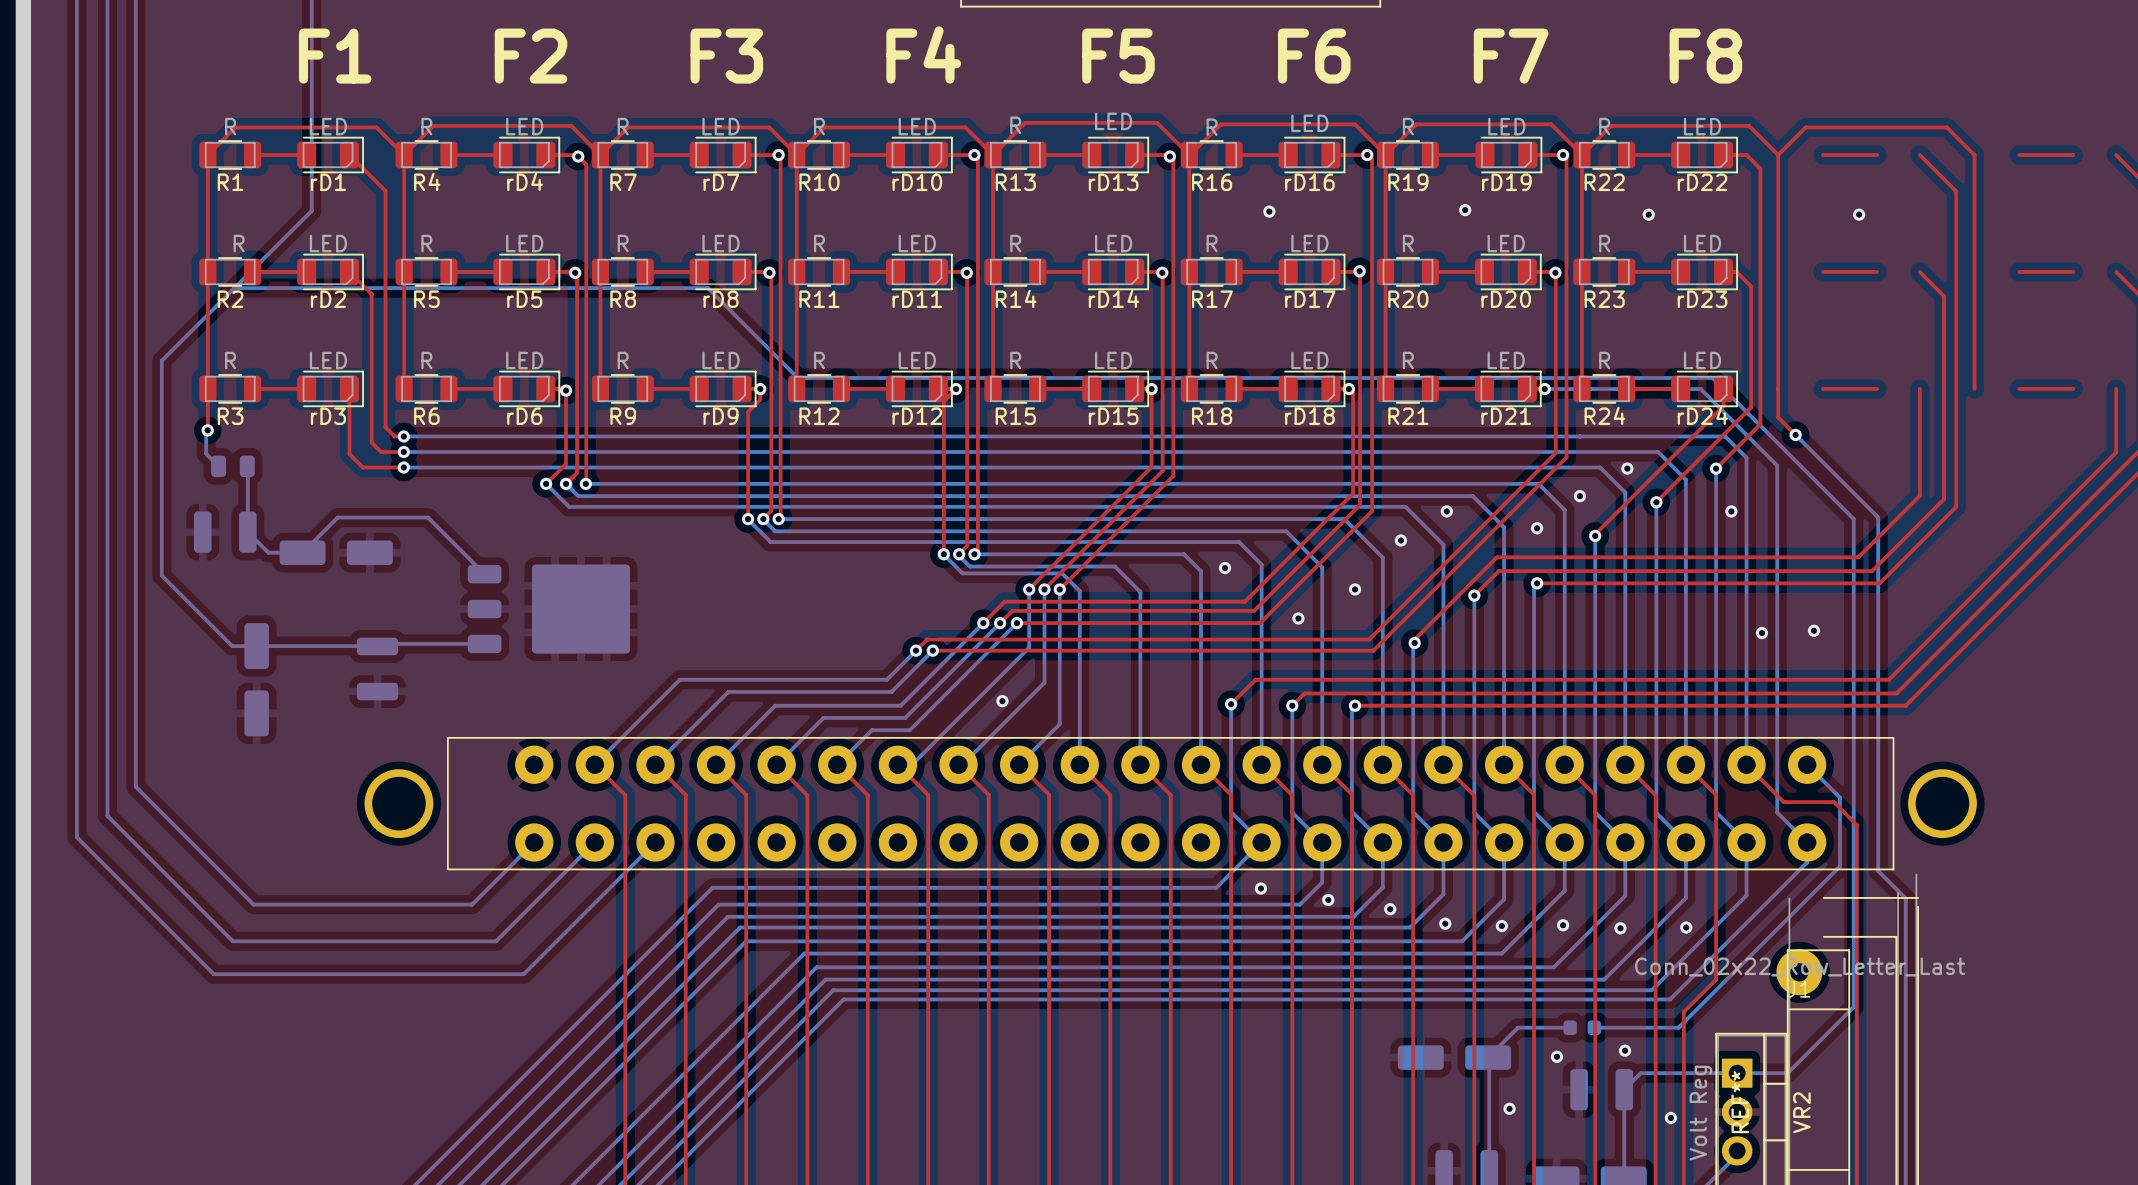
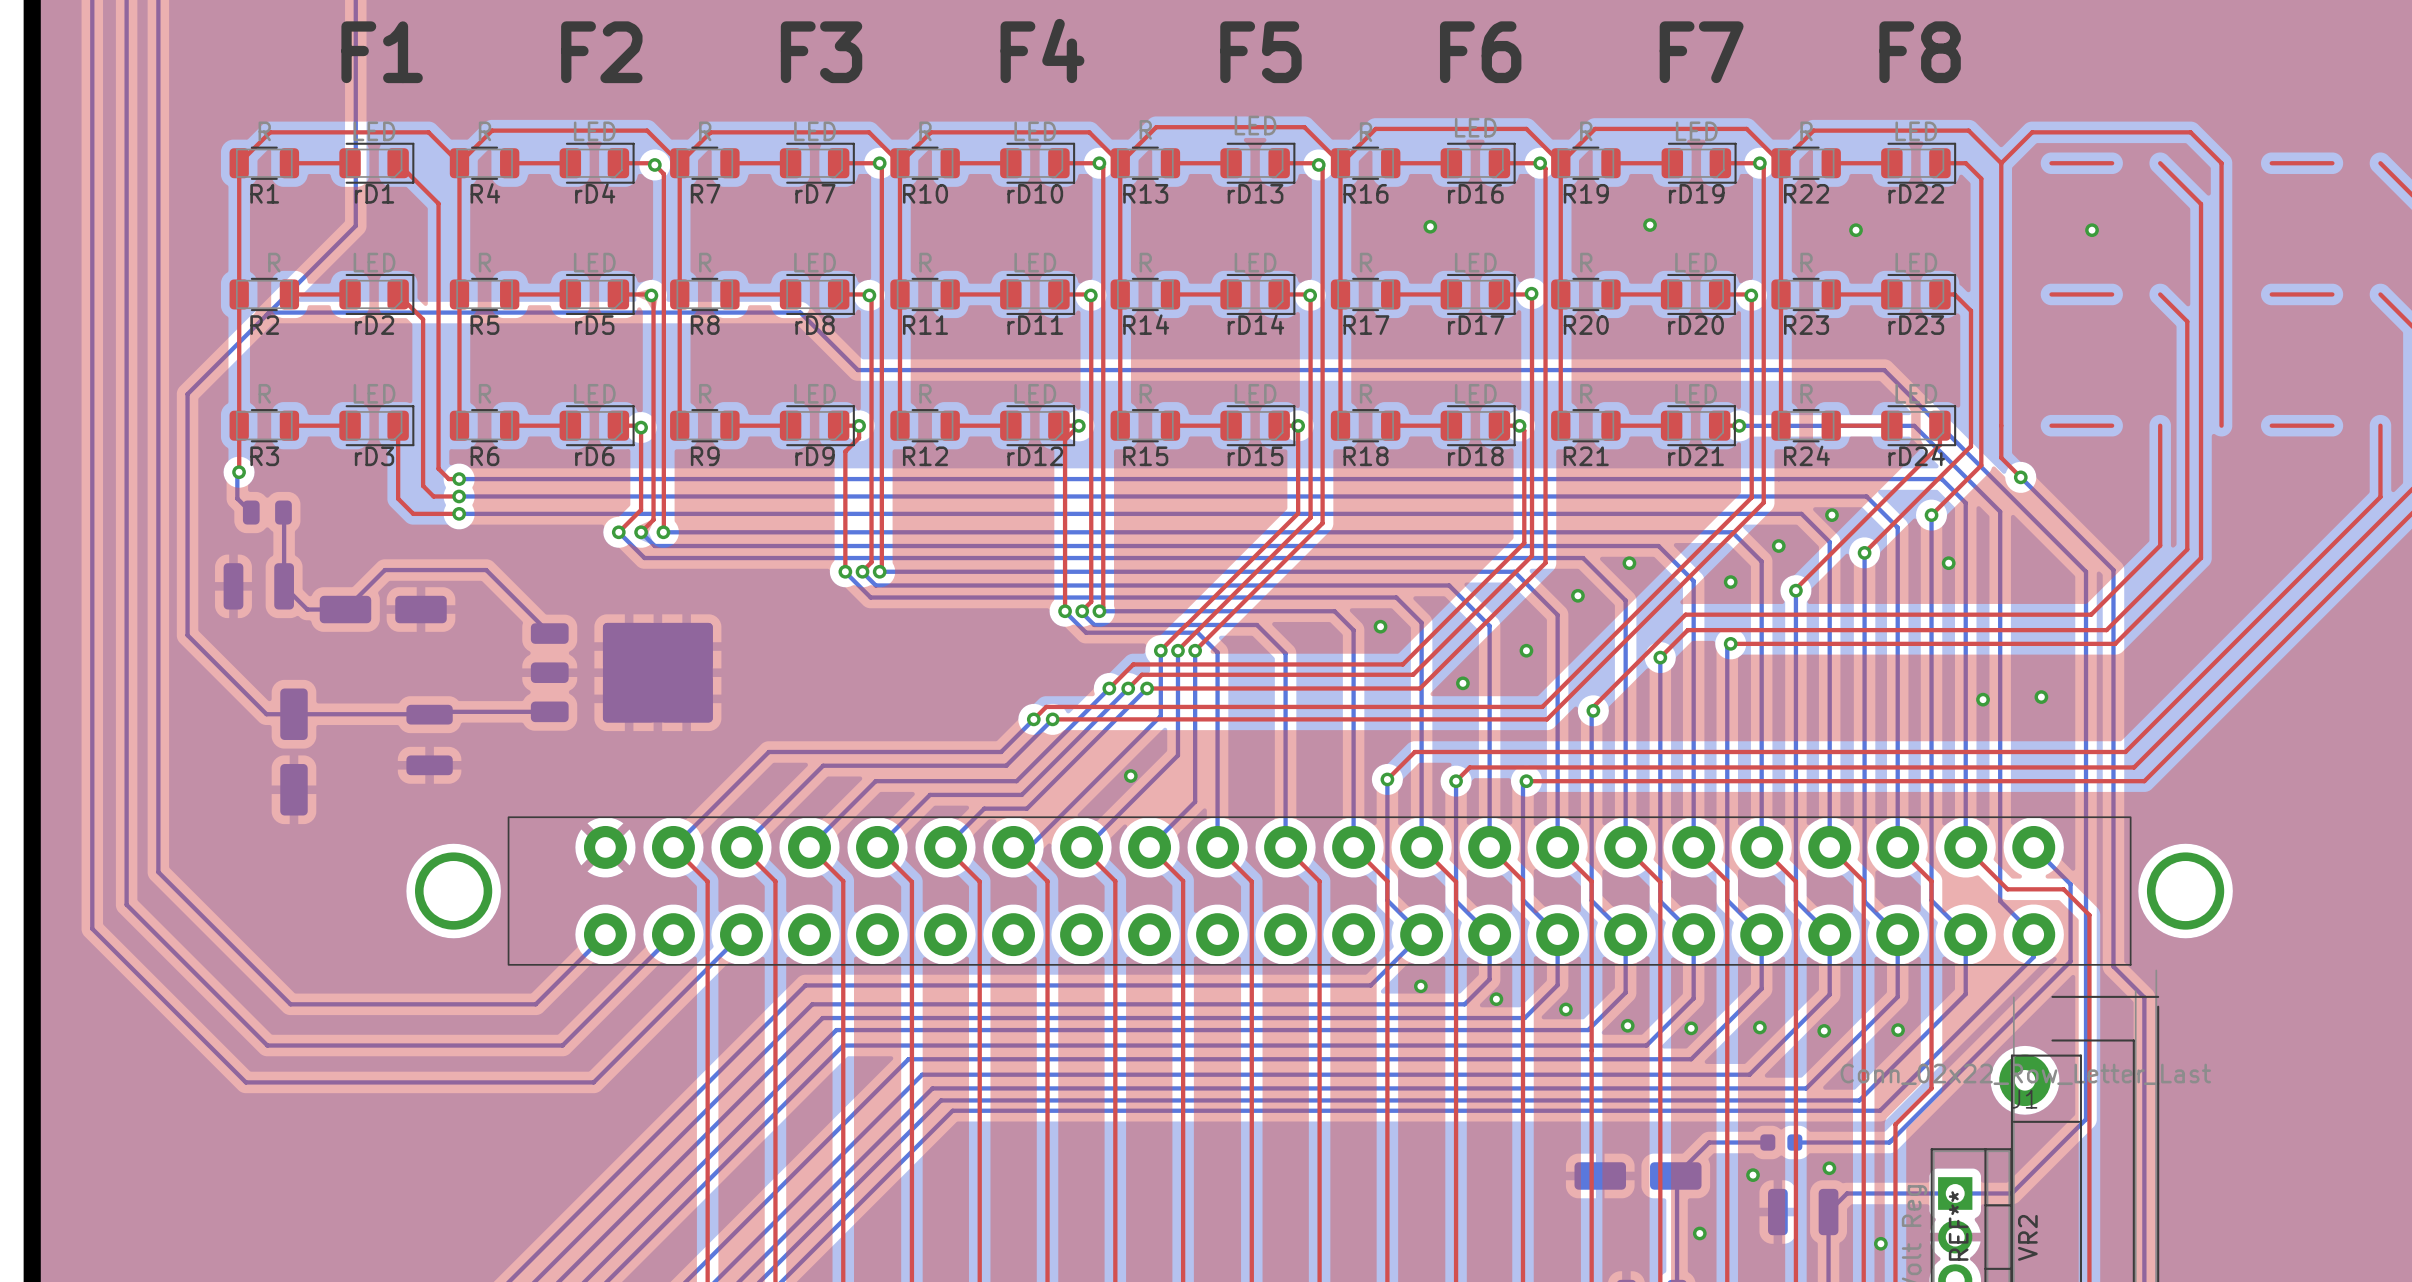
bottom track: (759, 339) (797, 377) (1712, 377) -> (857, 370) (1884, 370) (1927, 413)

